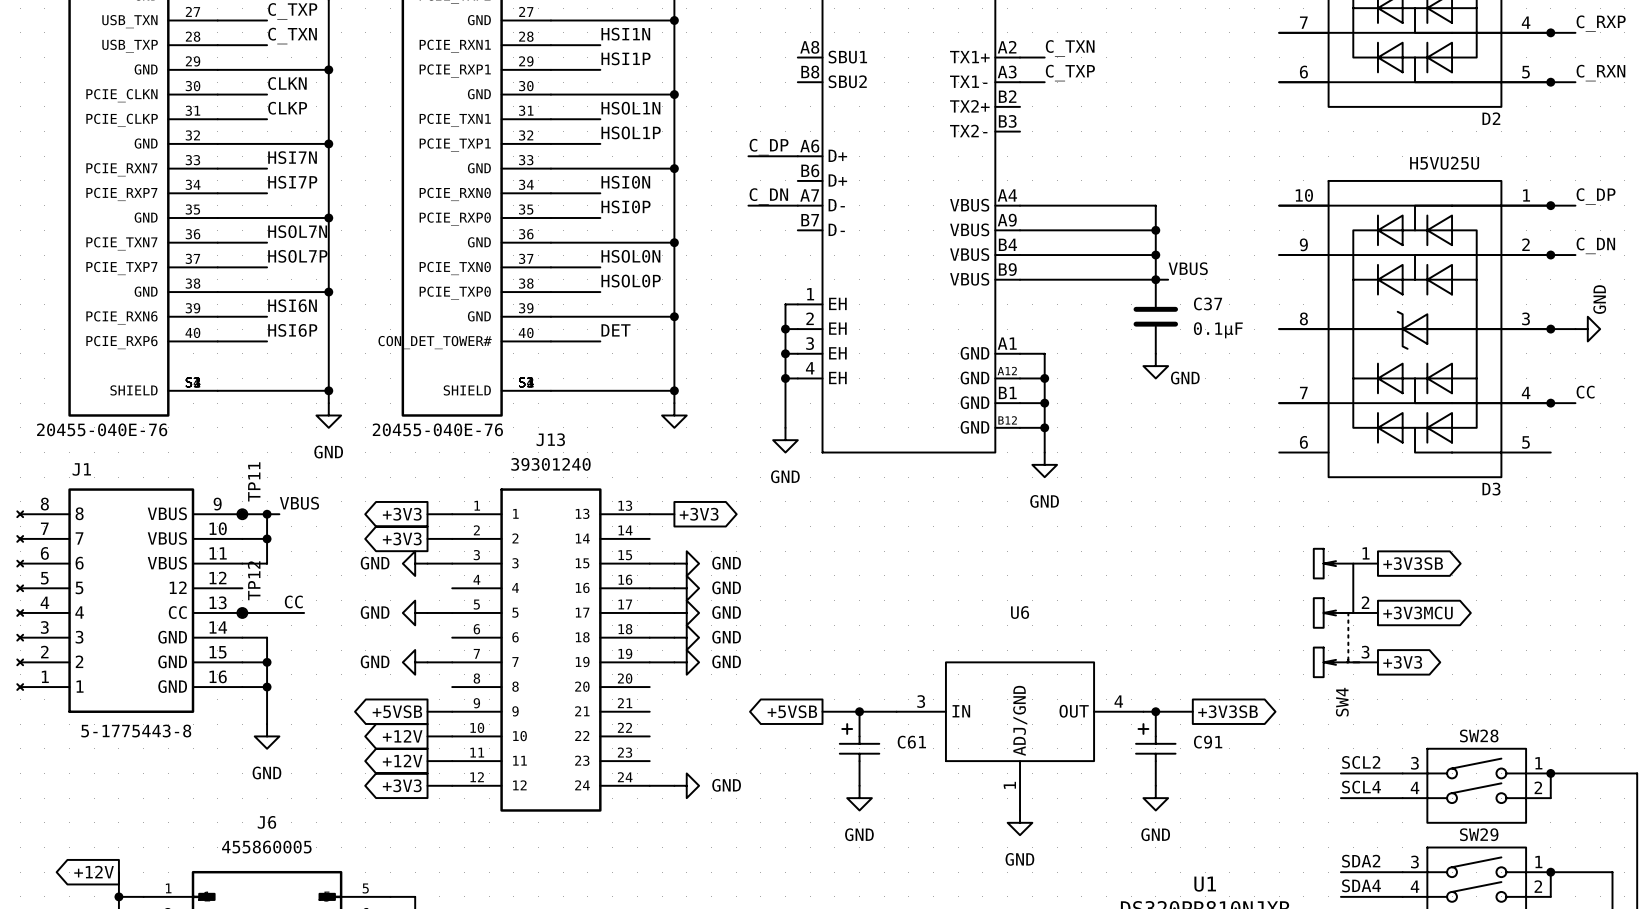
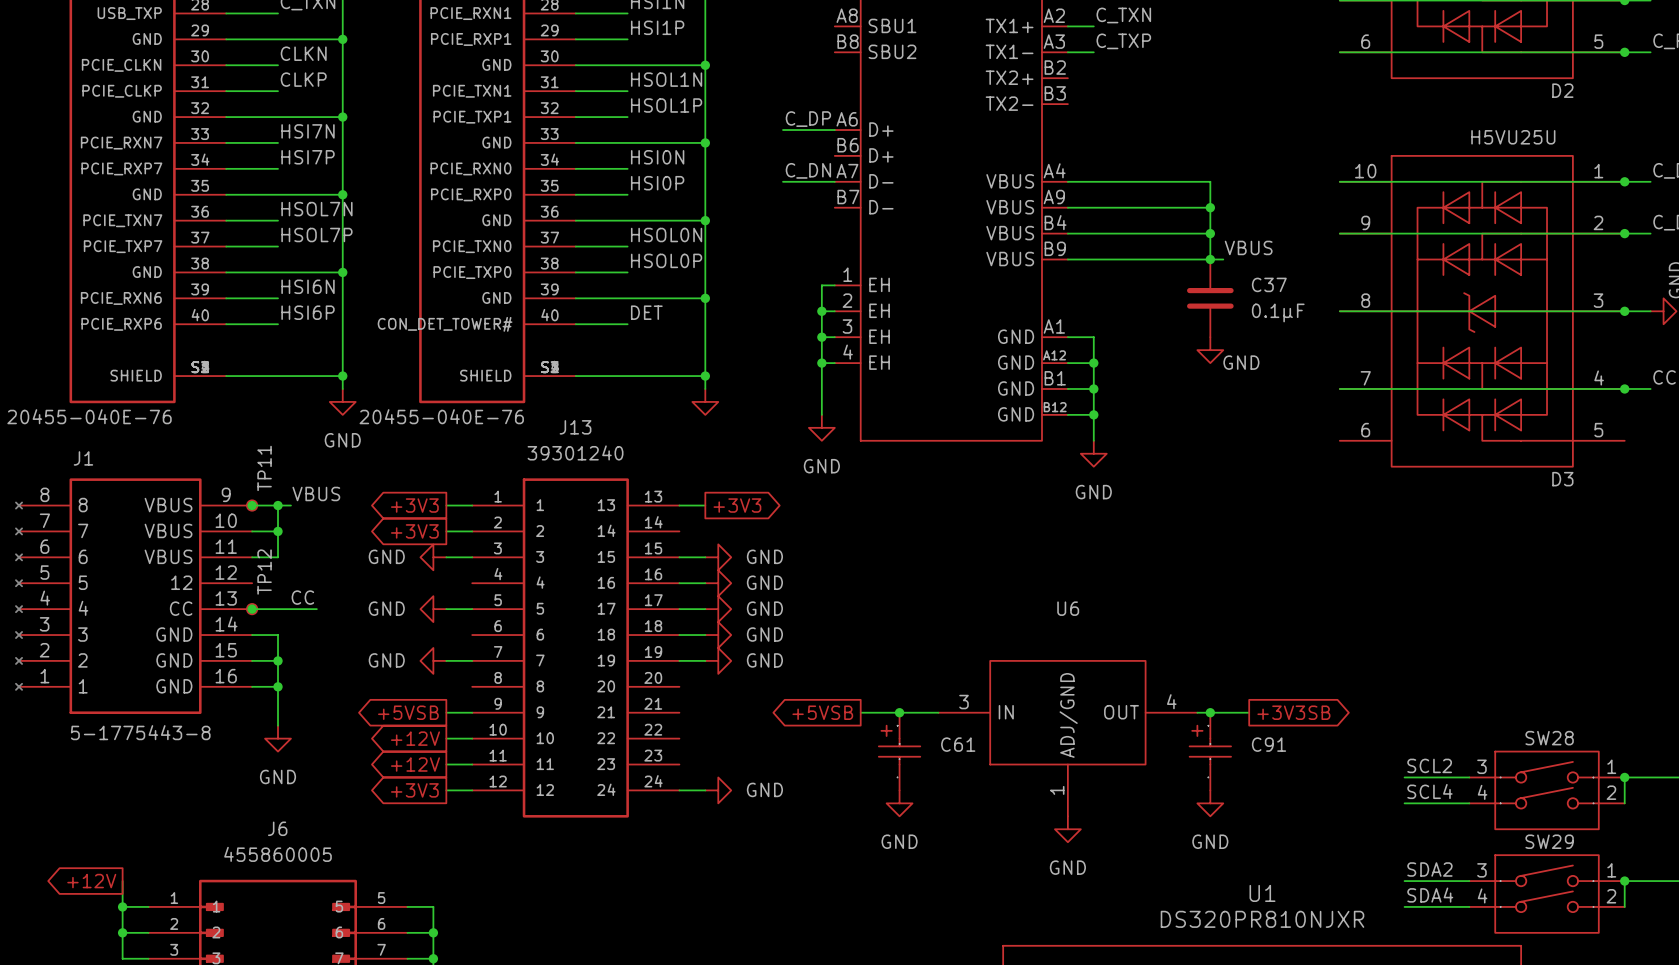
global label: +3V3SB (1413, 563) -> none
SW4: (1345, 612) -> none
global label: +3V3MCU (1418, 612) -> none
global label: +3V3 (1402, 662) -> none

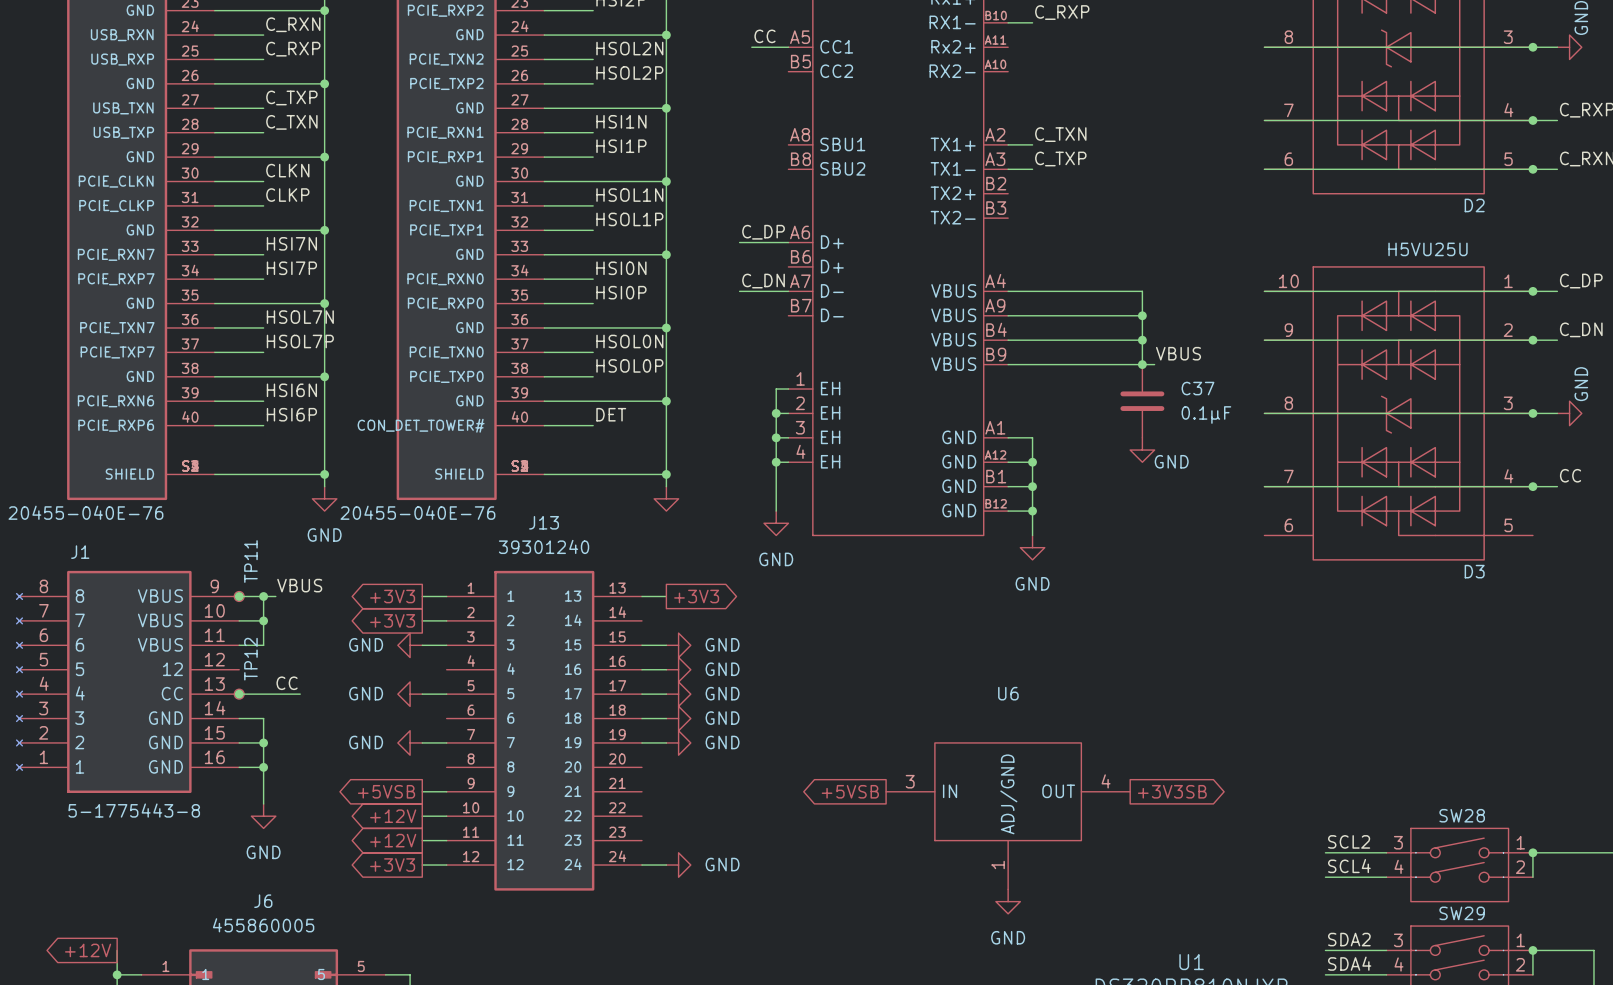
global label position: +5VSB (822, 712) -> +5VSB (850, 791)
wire: (860, 712) (938, 712) -> none
junction: (899, 712) -> none
wire: (1197, 712) (1249, 712) -> none
junction: (1210, 712) -> none
global label position: +3V3SB (1293, 712) -> +3V3SB (1172, 791)
C61: (899, 751) -> none
C91: (1210, 751) -> none
power symbol: GND (899, 803) -> none
power symbol: GND (1210, 803) -> none

